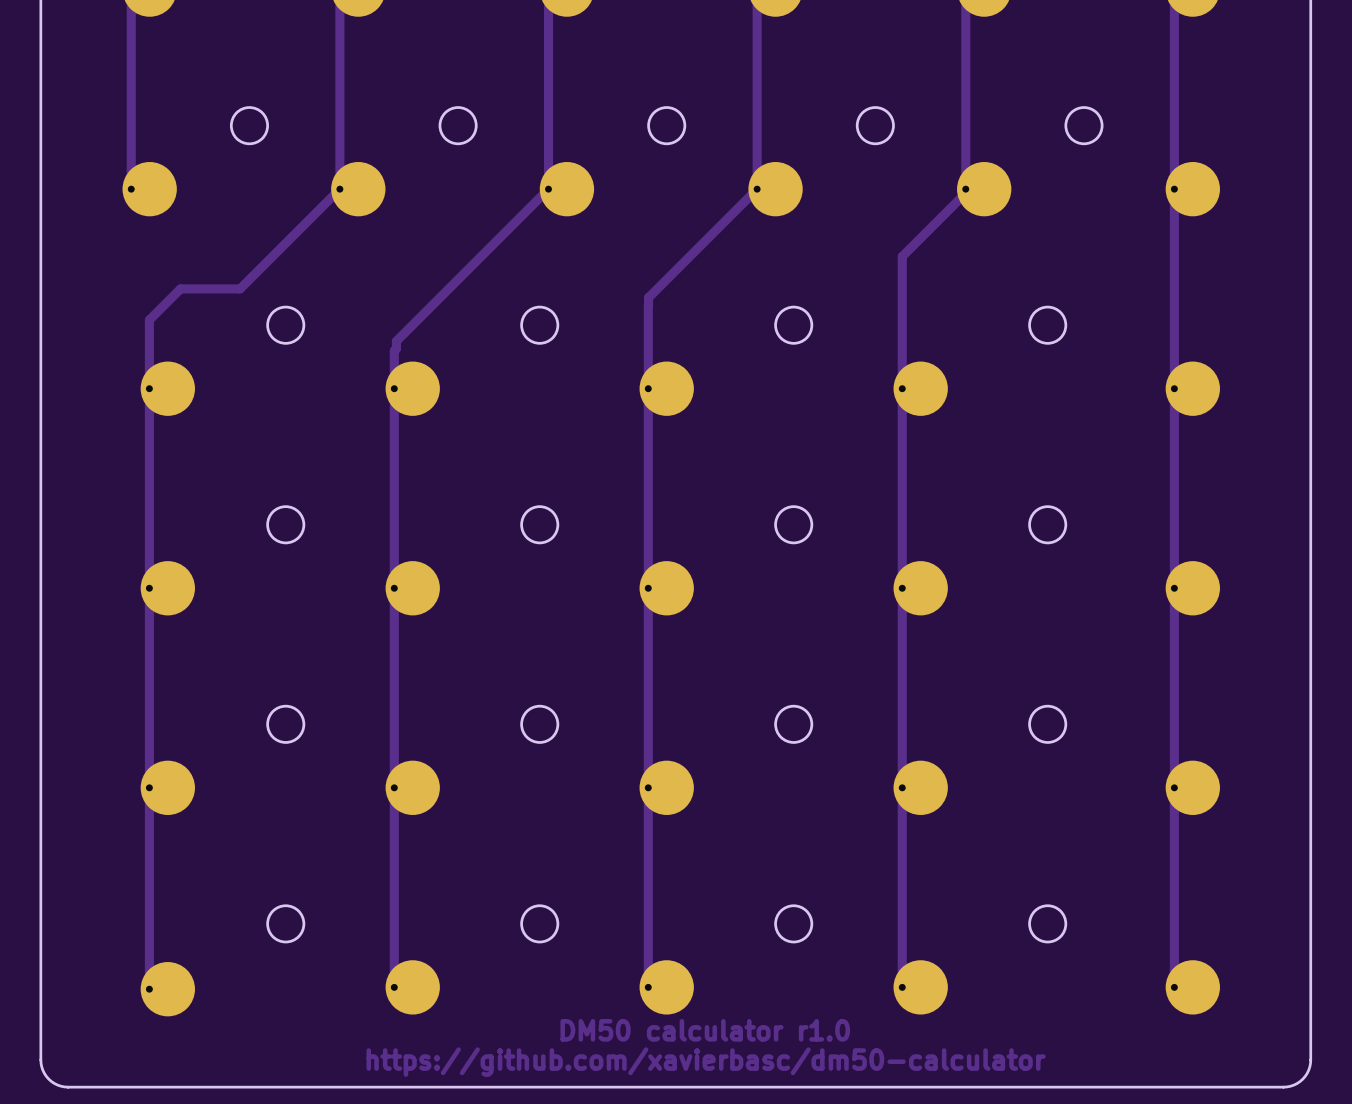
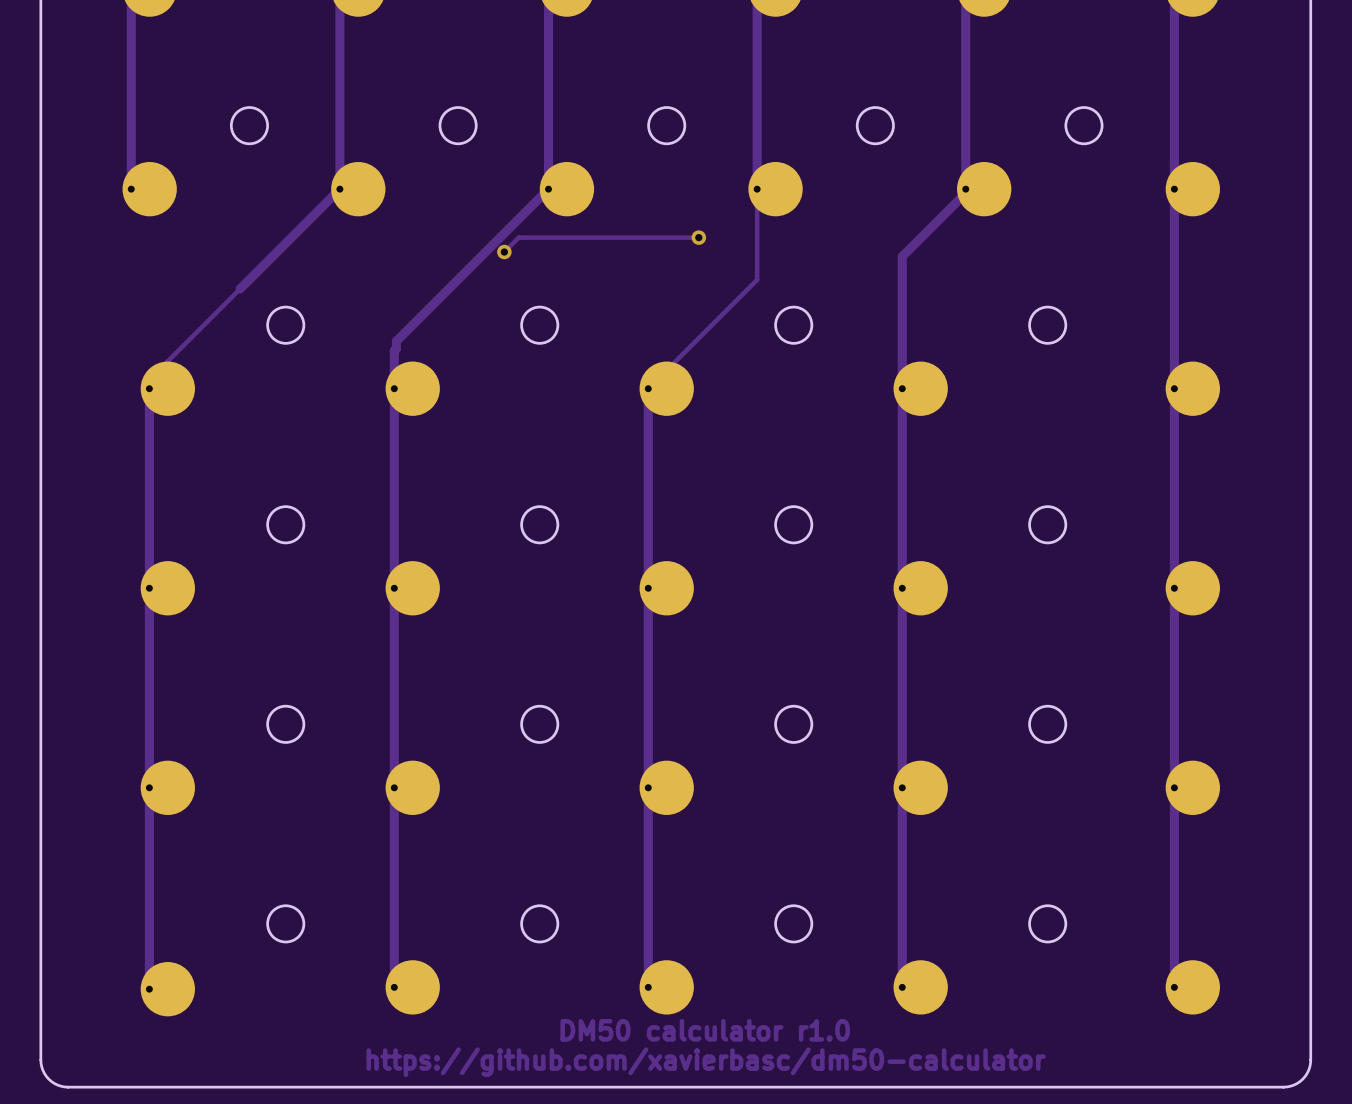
track: (757, 189) (648, 297) (648, 388) -> (757, 189) (757, 279) (648, 388)
track: none -> (698, 237) (518, 237) (504, 252)
via: none -> (698, 237)
via: none -> (504, 252)
track: (240, 288) (180, 288) (149, 320) (149, 379) -> (240, 288) (149, 379)

